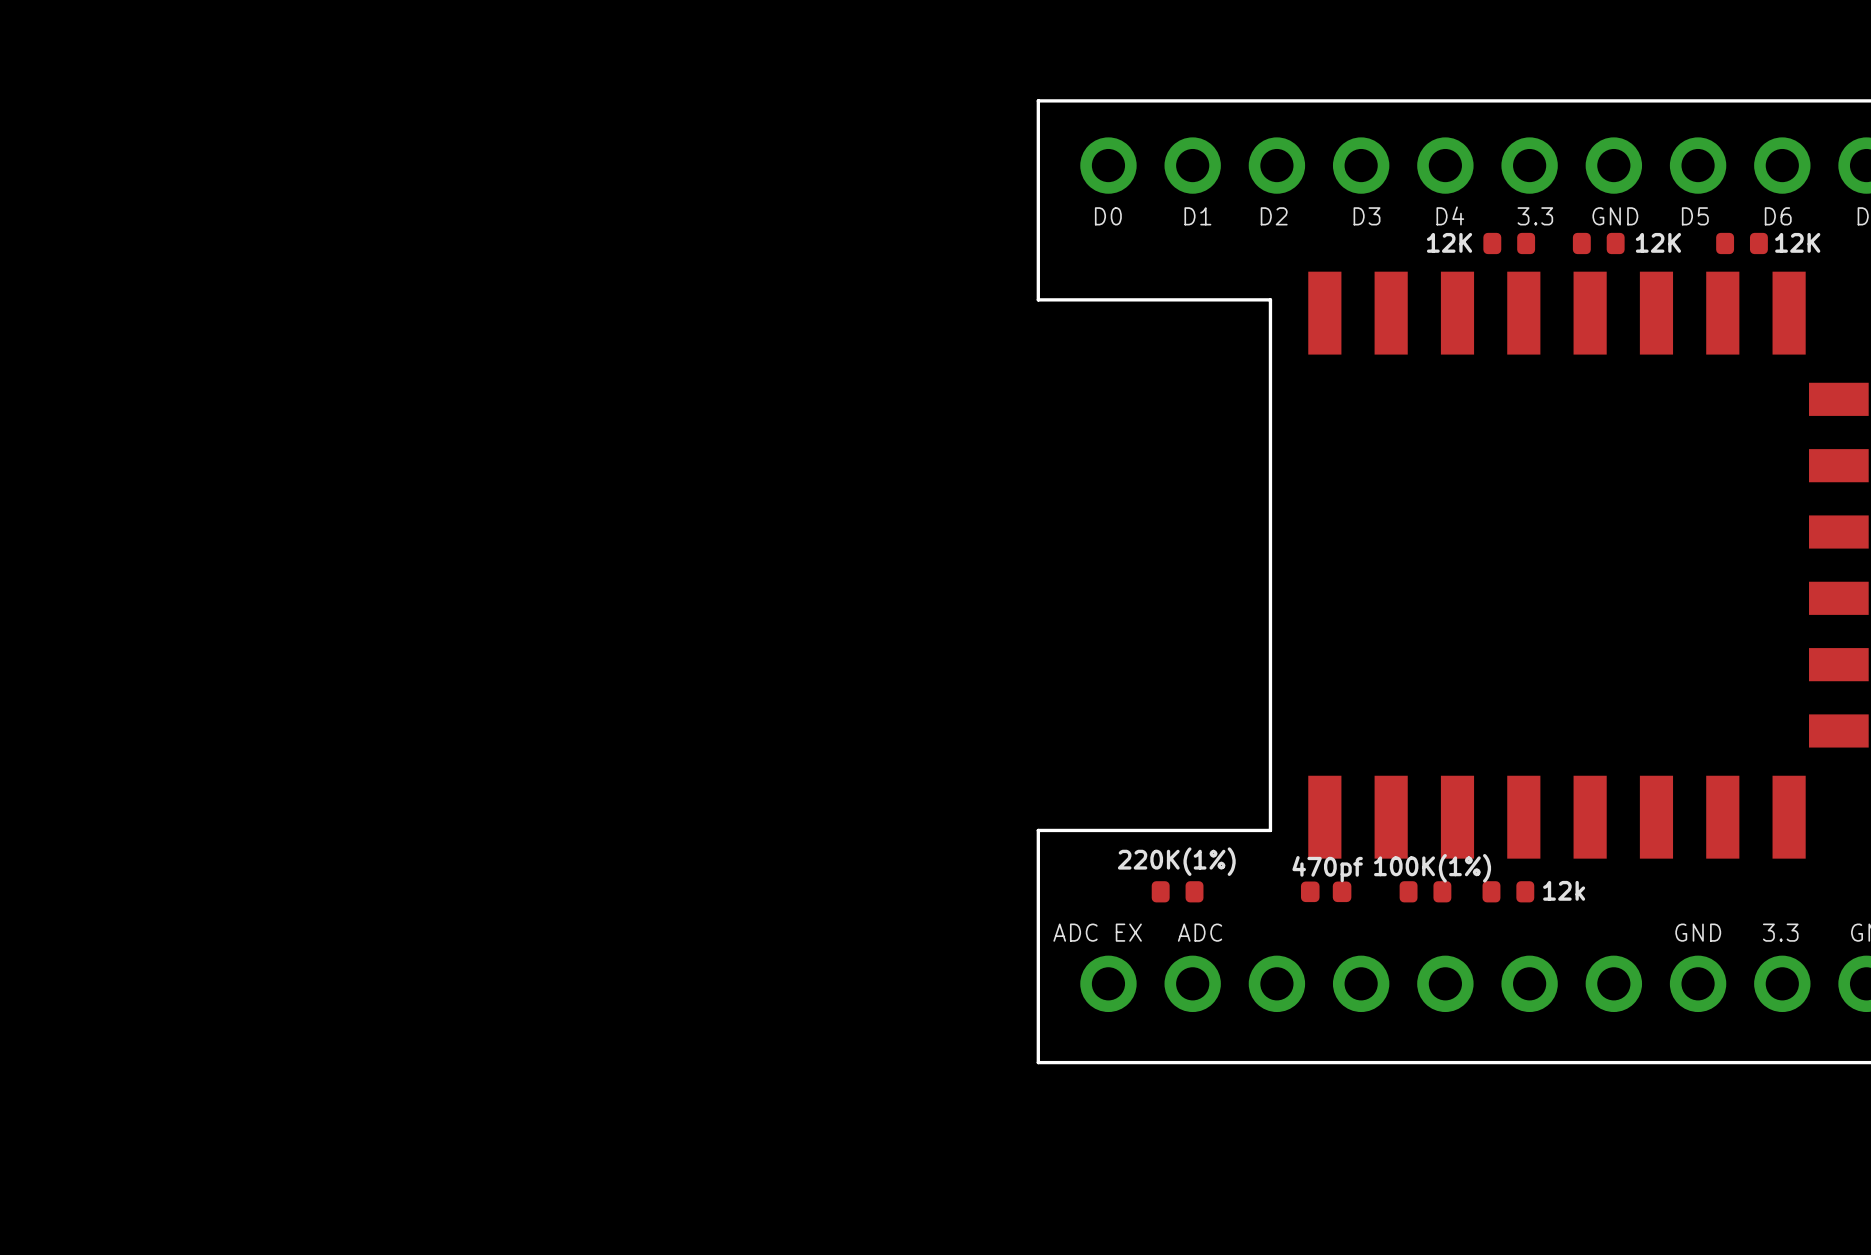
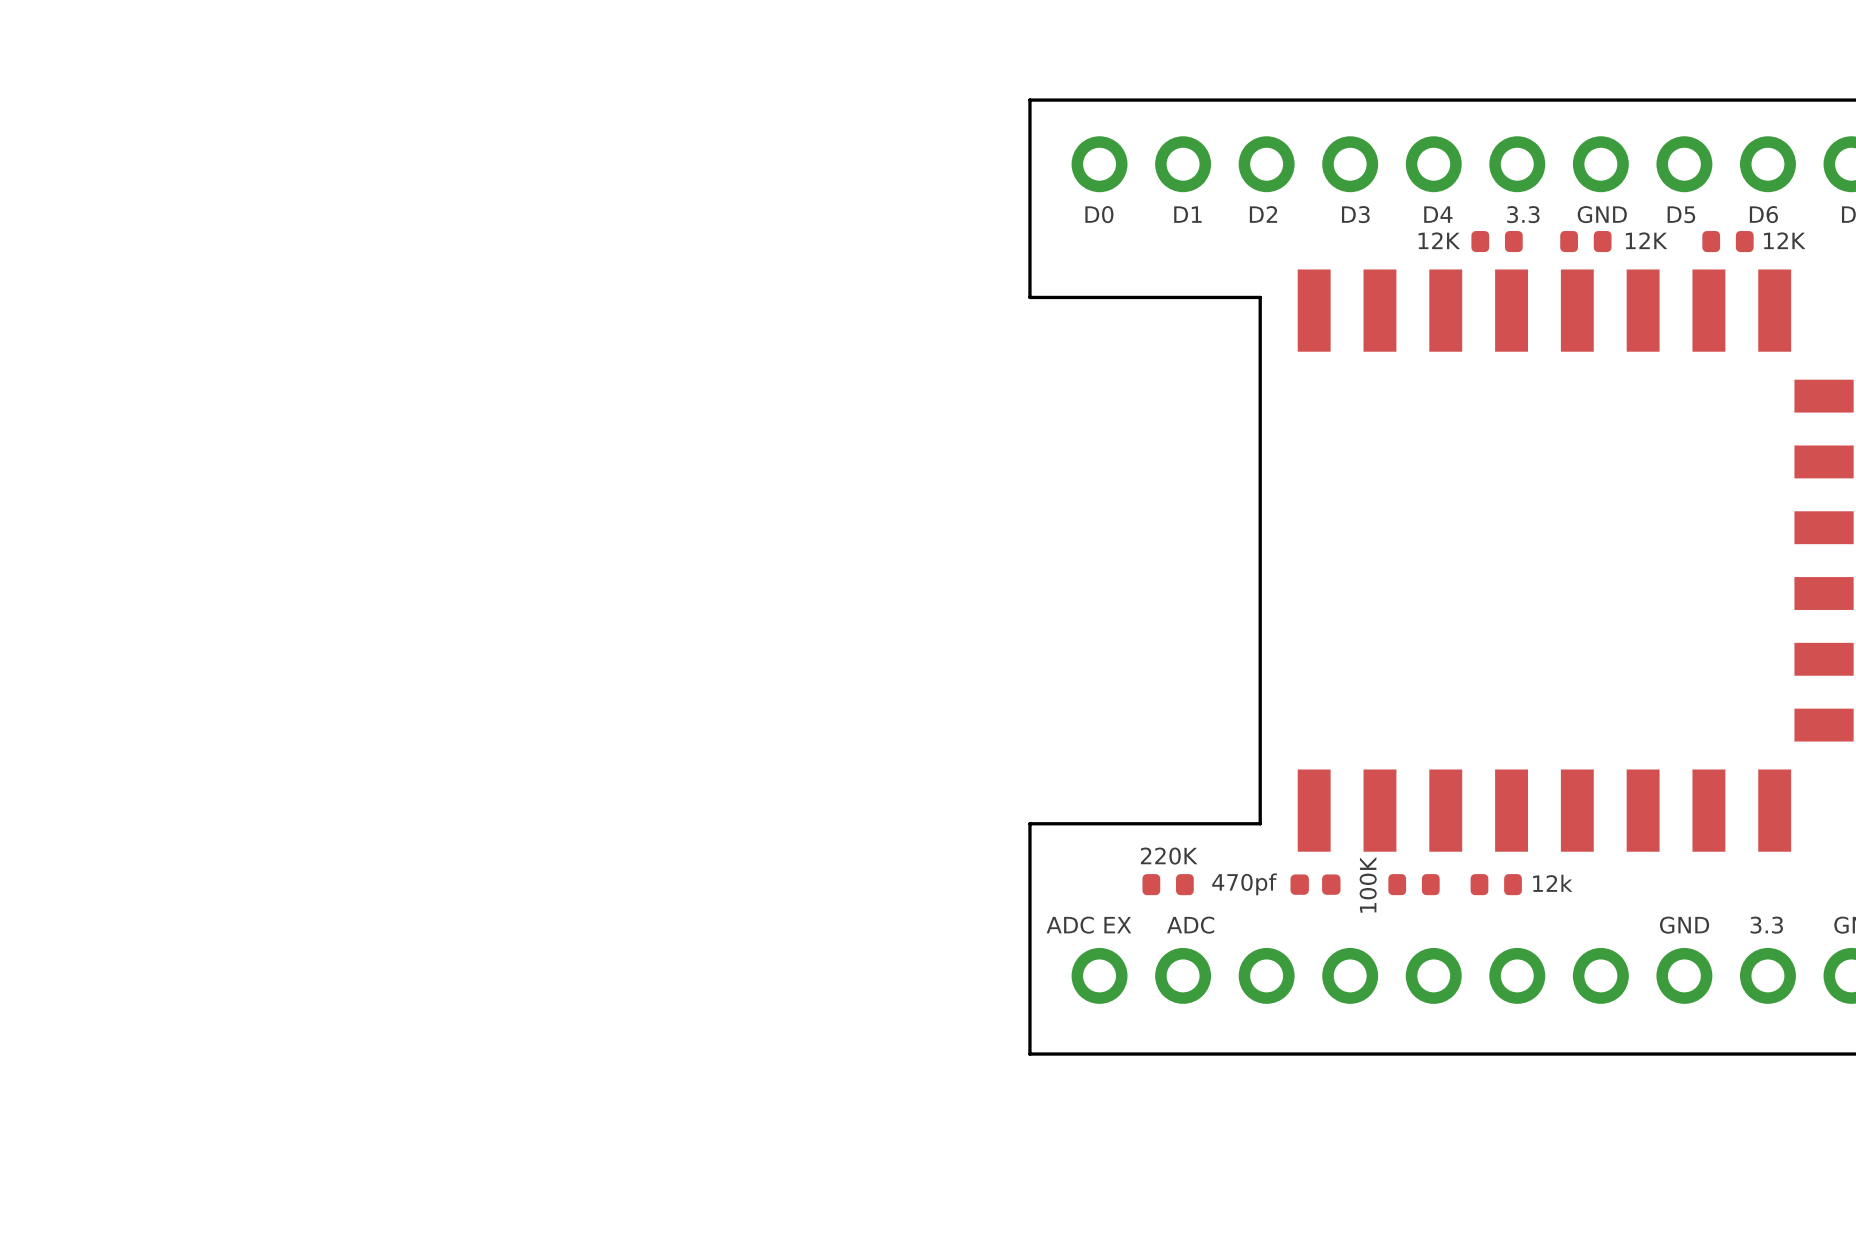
part value: 220K(1%) (1176, 861) -> 220K (1169, 856)
part value: 100K(1%) (1432, 868) -> 100K (1368, 884)
part value position: 470pf (1327, 869) -> 470pf (1244, 884)

